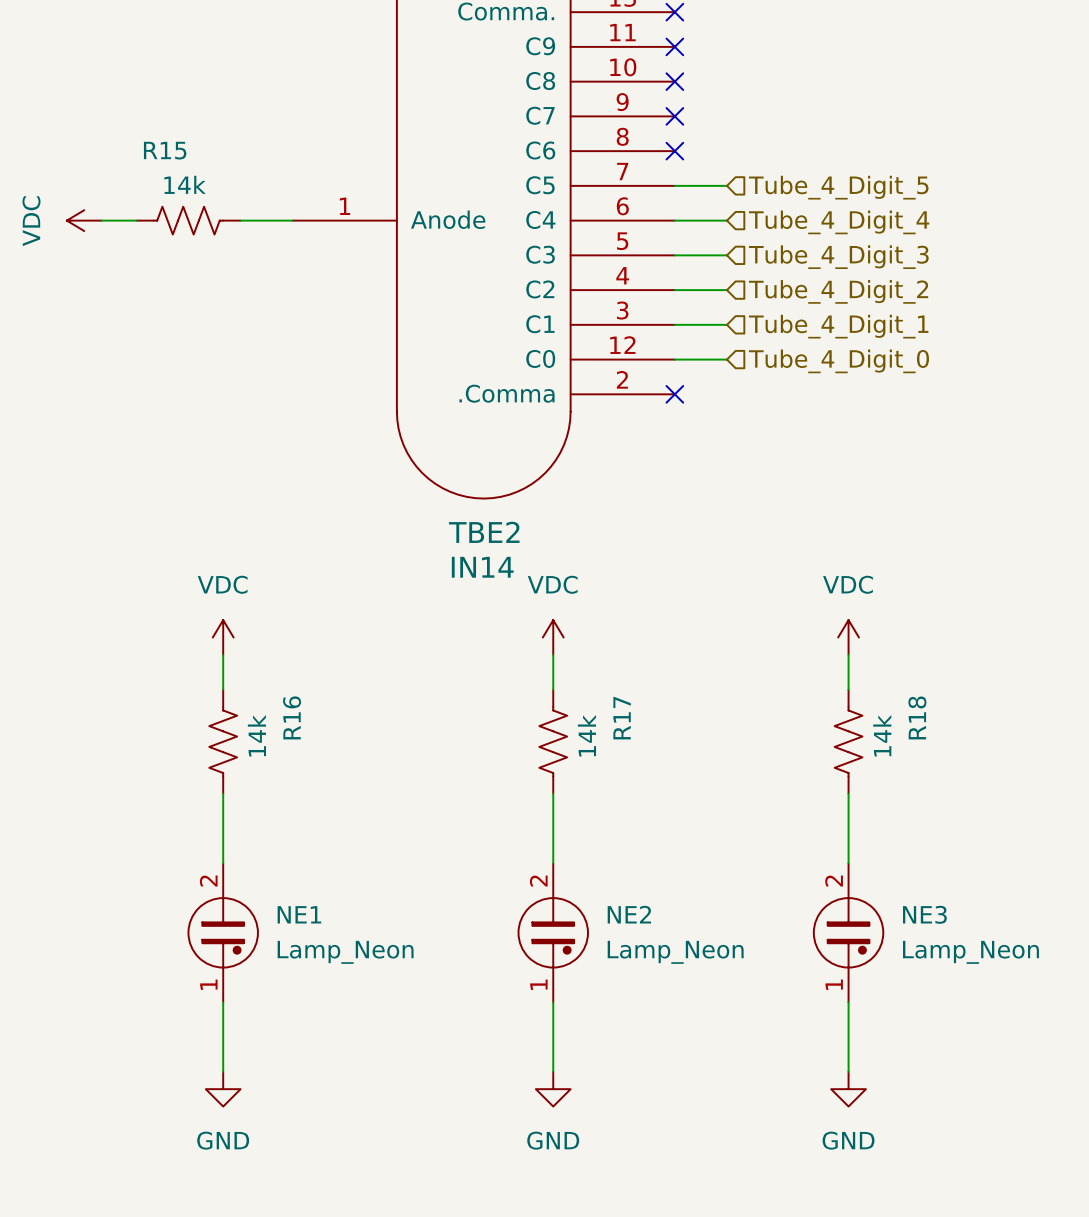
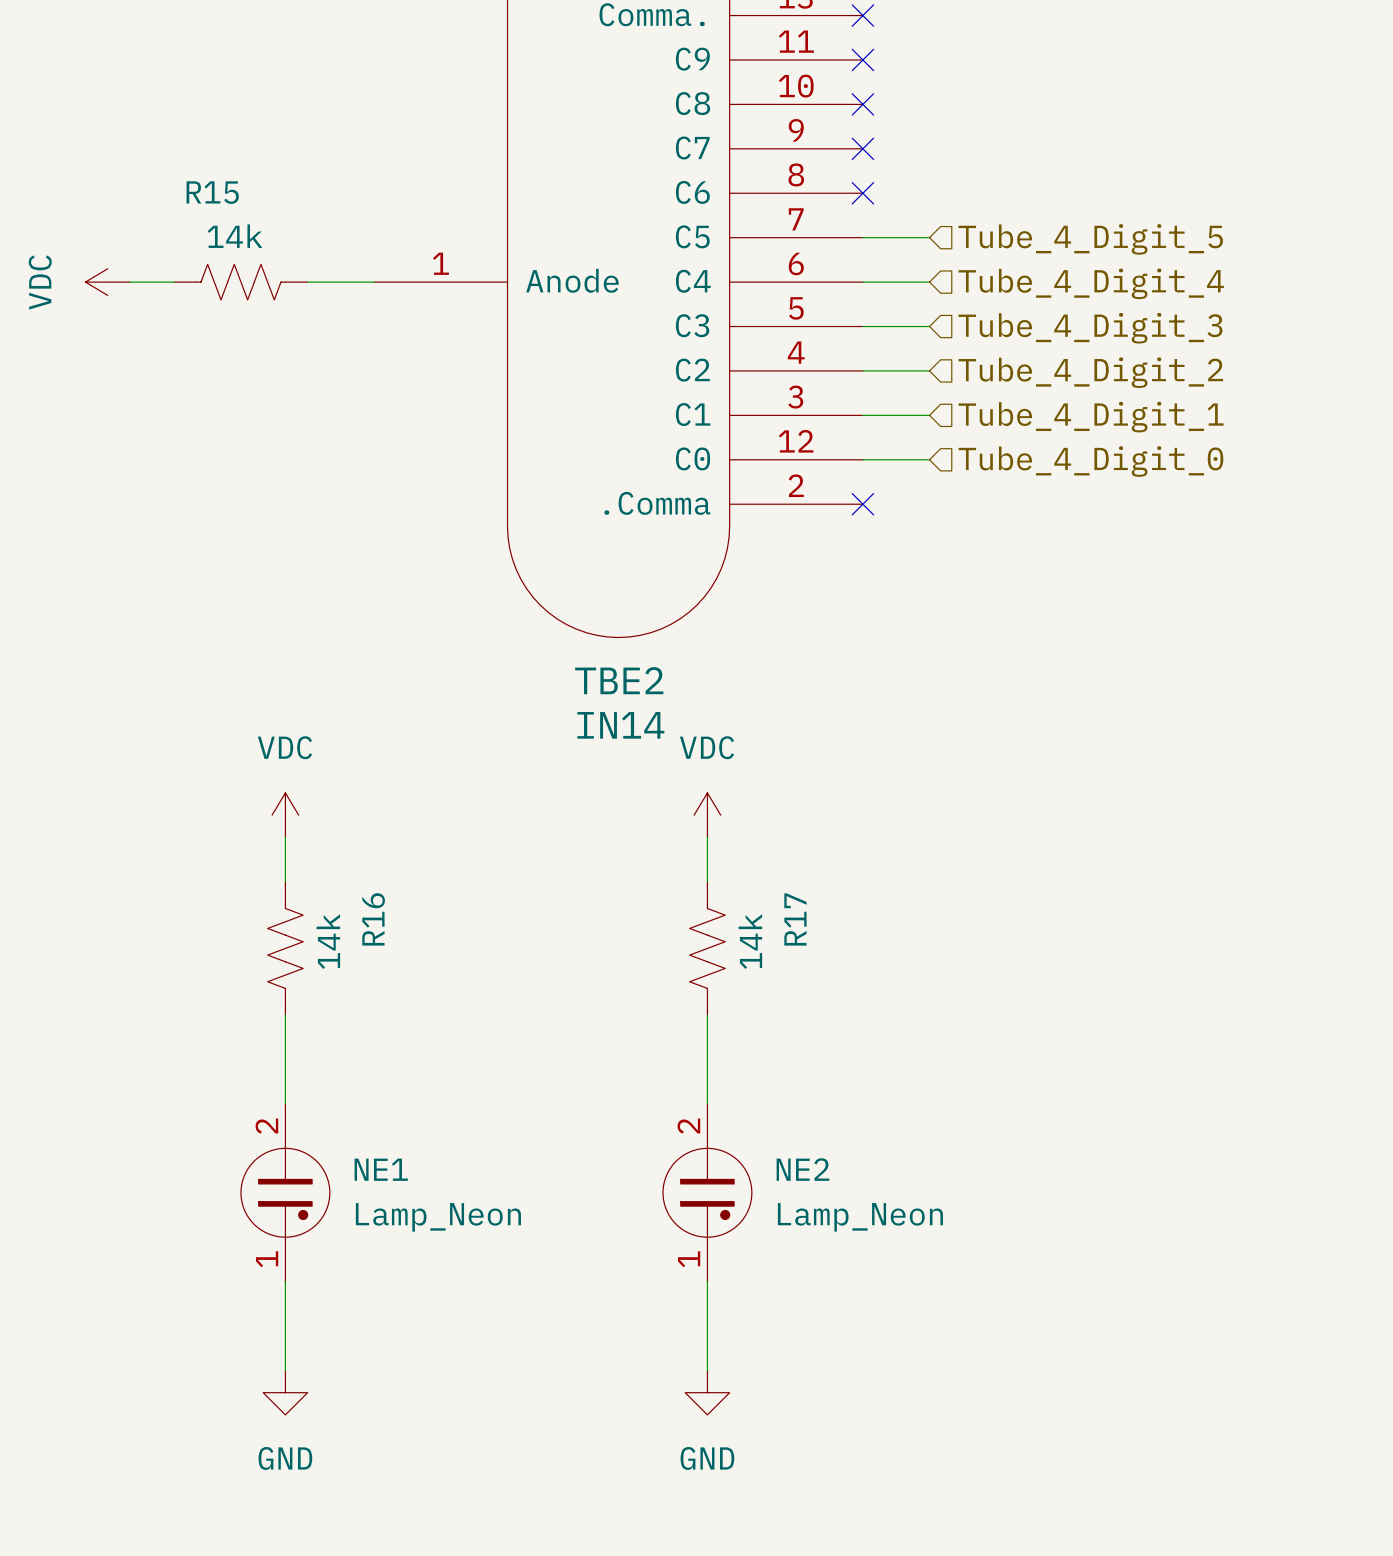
power symbol: VDC (848, 637) -> none
wire: (848, 654) (848, 689) -> none
R18: 14k (848, 741) -> none
wire: (848, 793) (848, 863) -> none
NE3: Lamp_Neon (848, 932) -> none
wire: (848, 1002) (848, 1071) -> none
power symbol: GND (848, 1089) -> none

